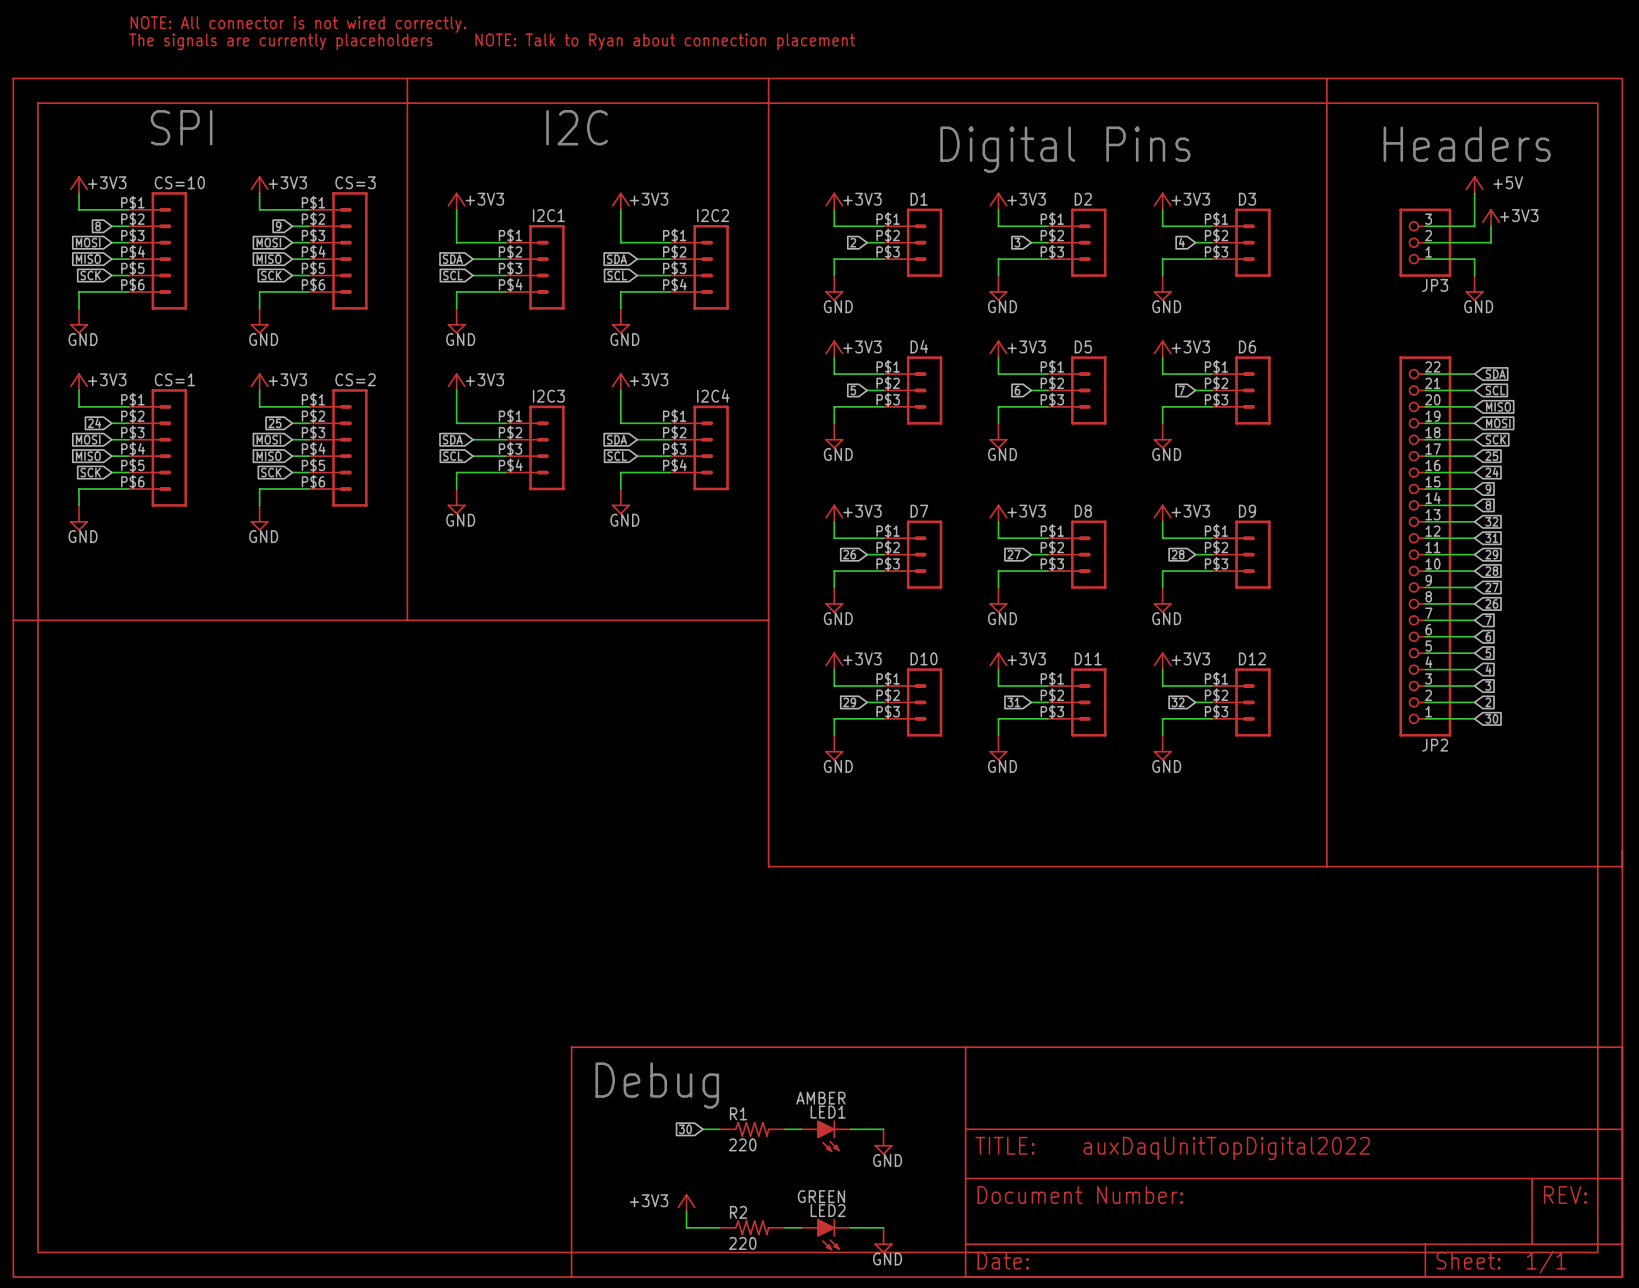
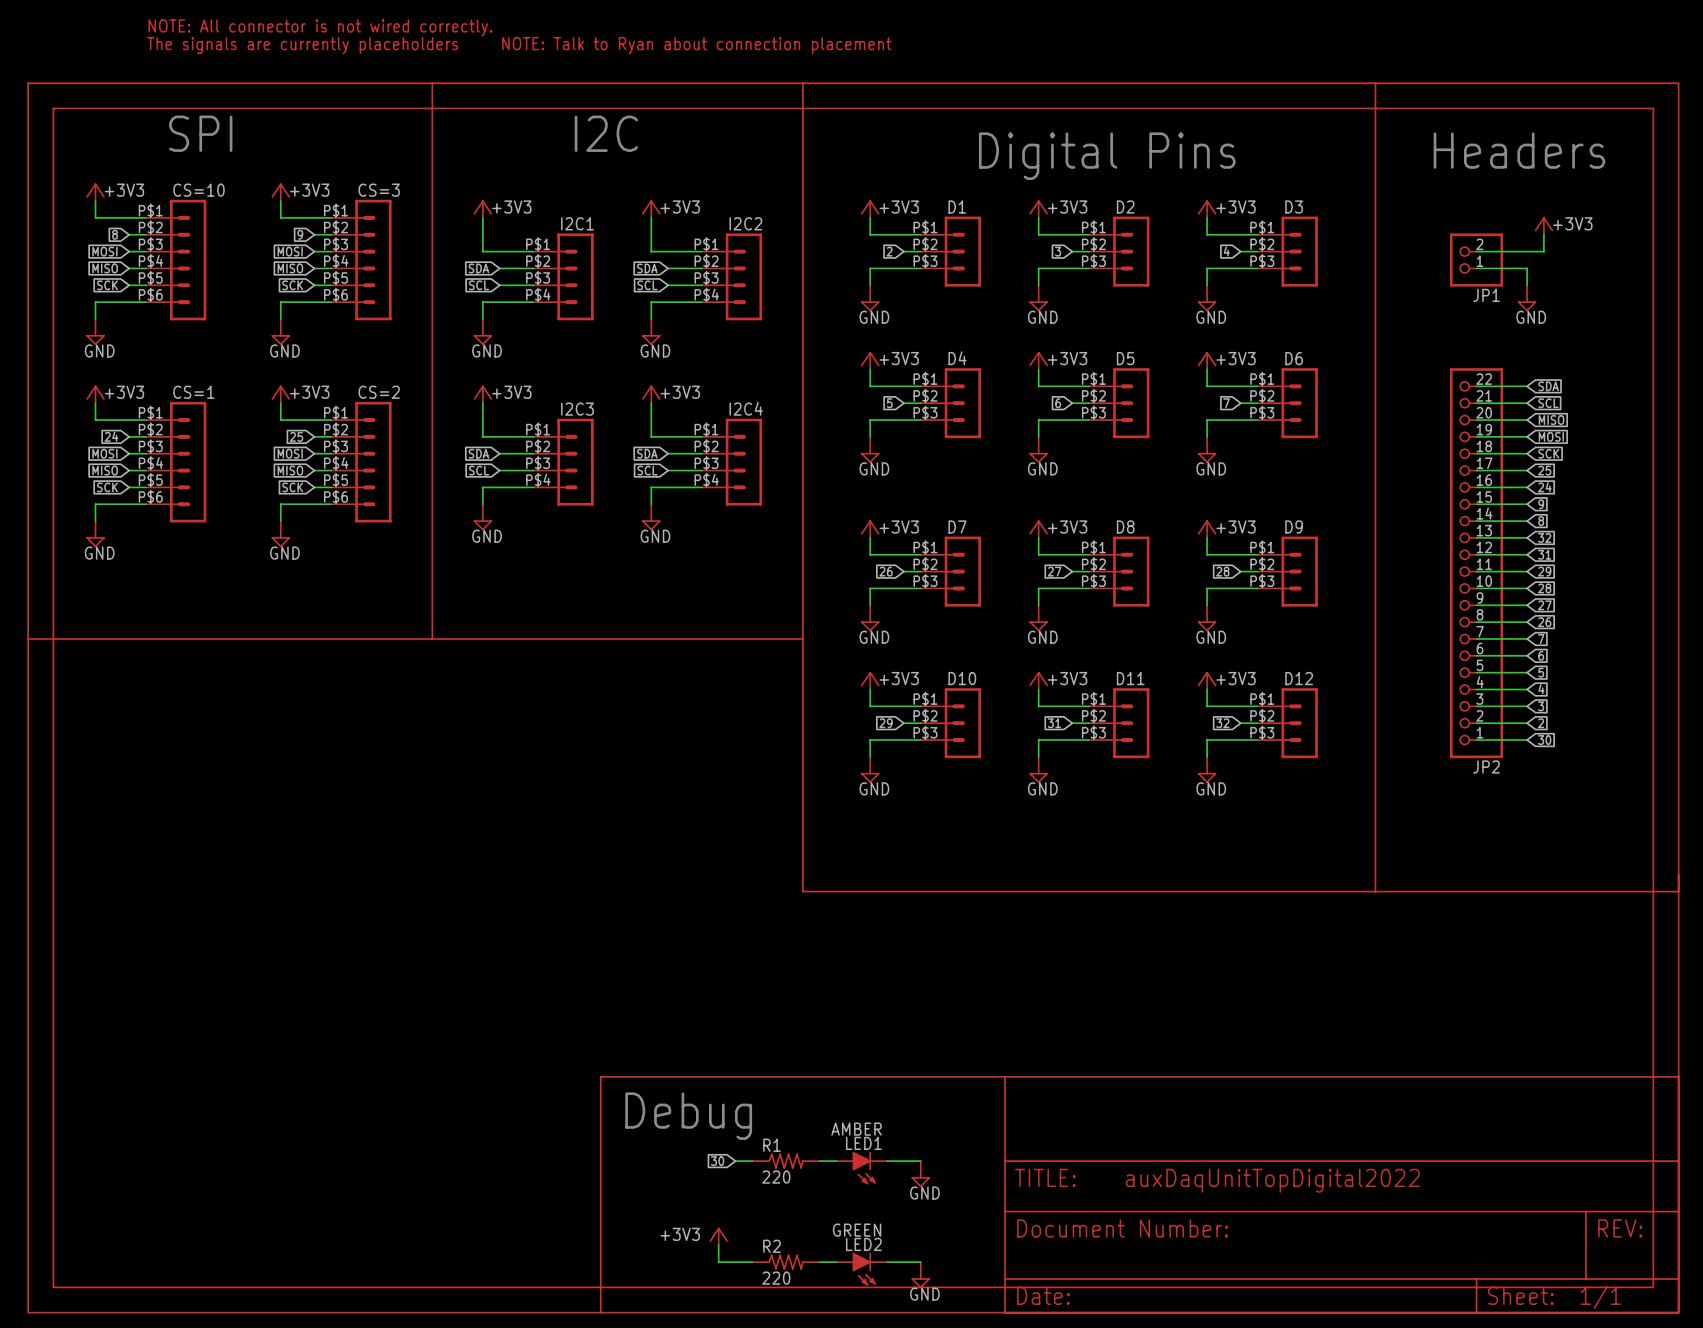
power symbol: +5V (1474, 184) -> none
wire: (1474, 193) (1474, 226) (1425, 226) -> none
JP3: (1425, 242) -> none
JP1: none -> (1476, 260)

